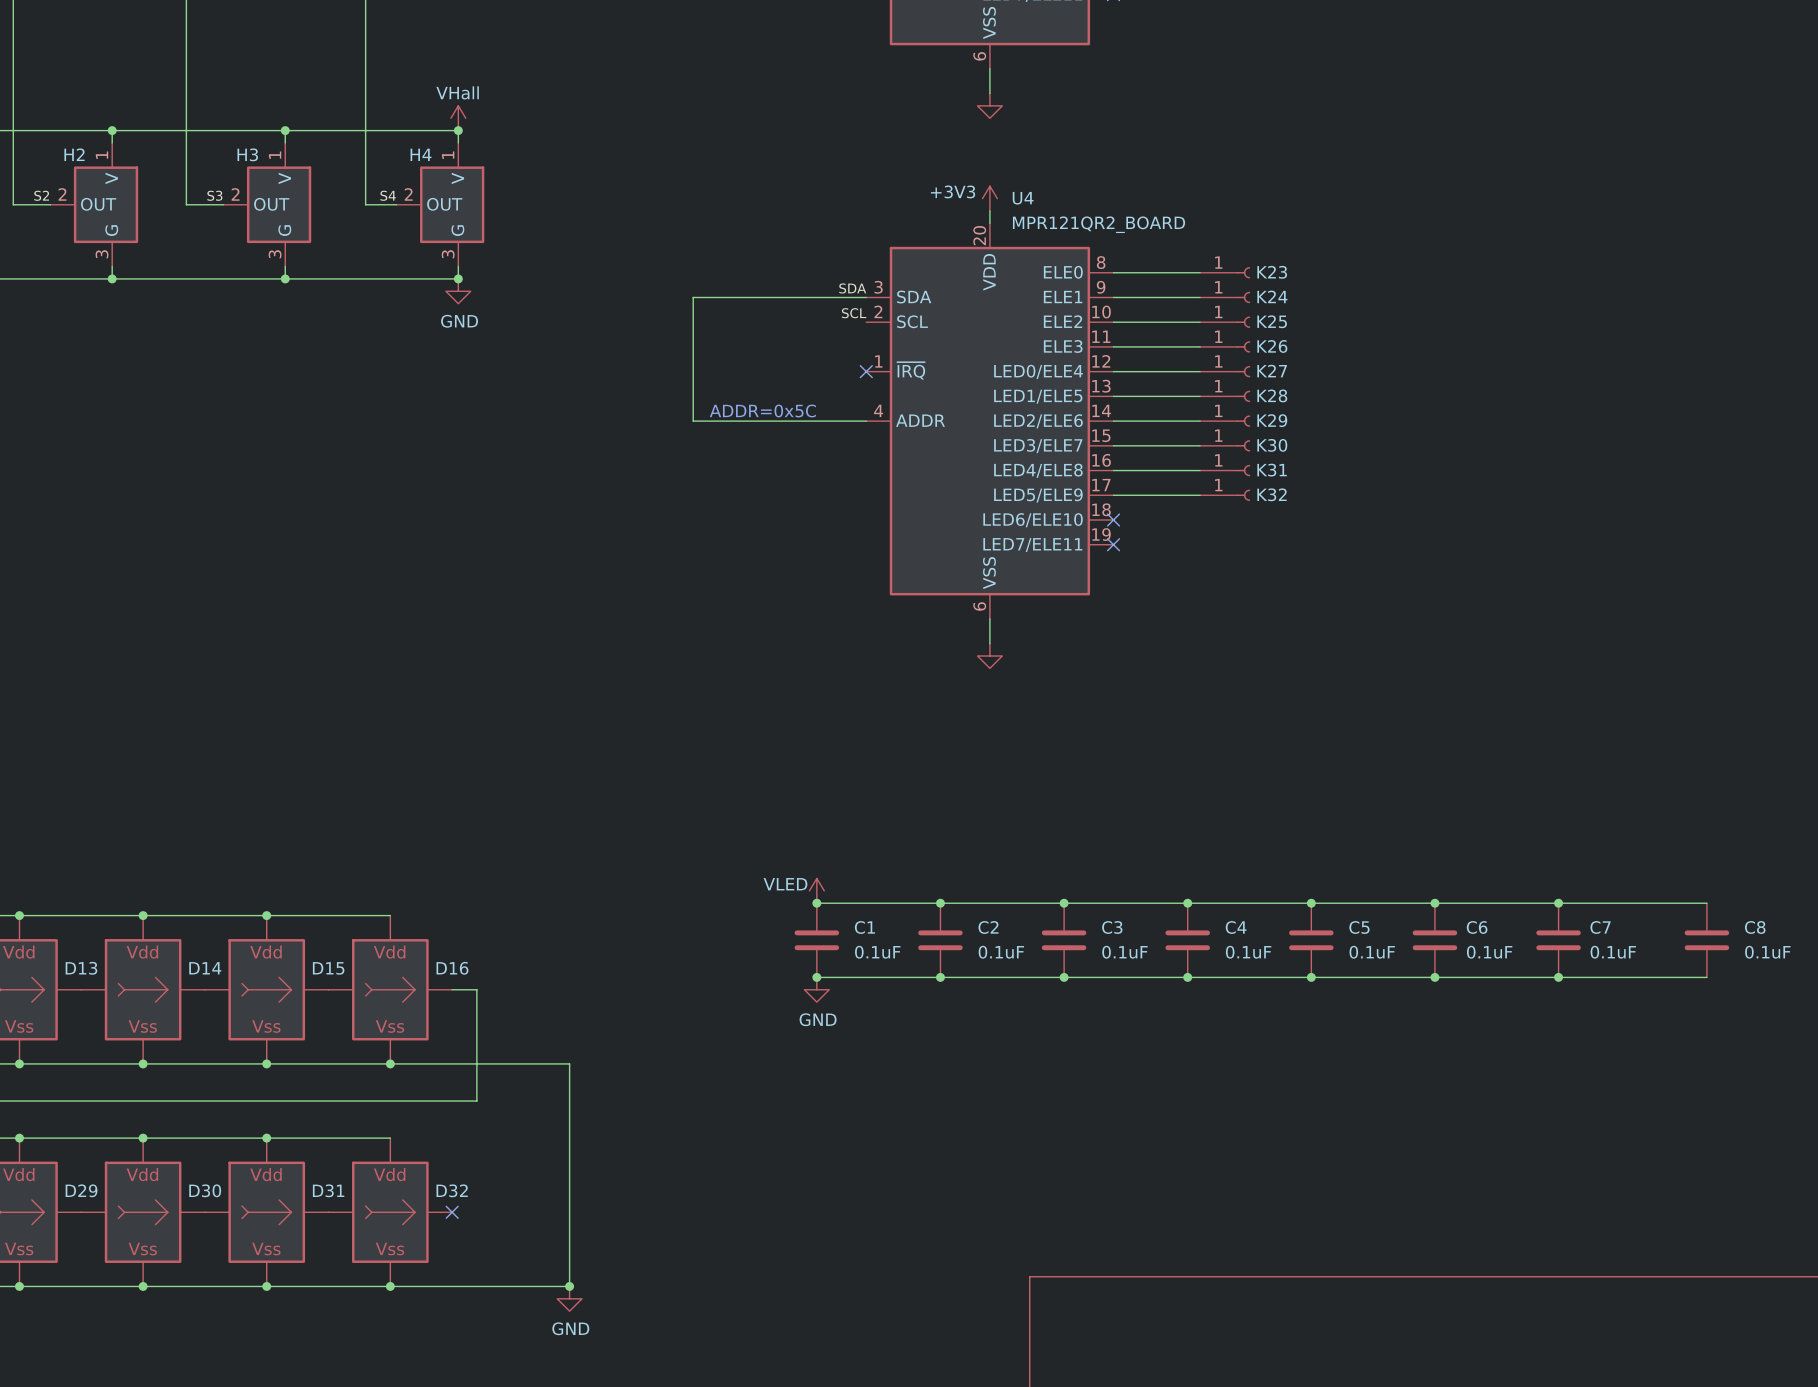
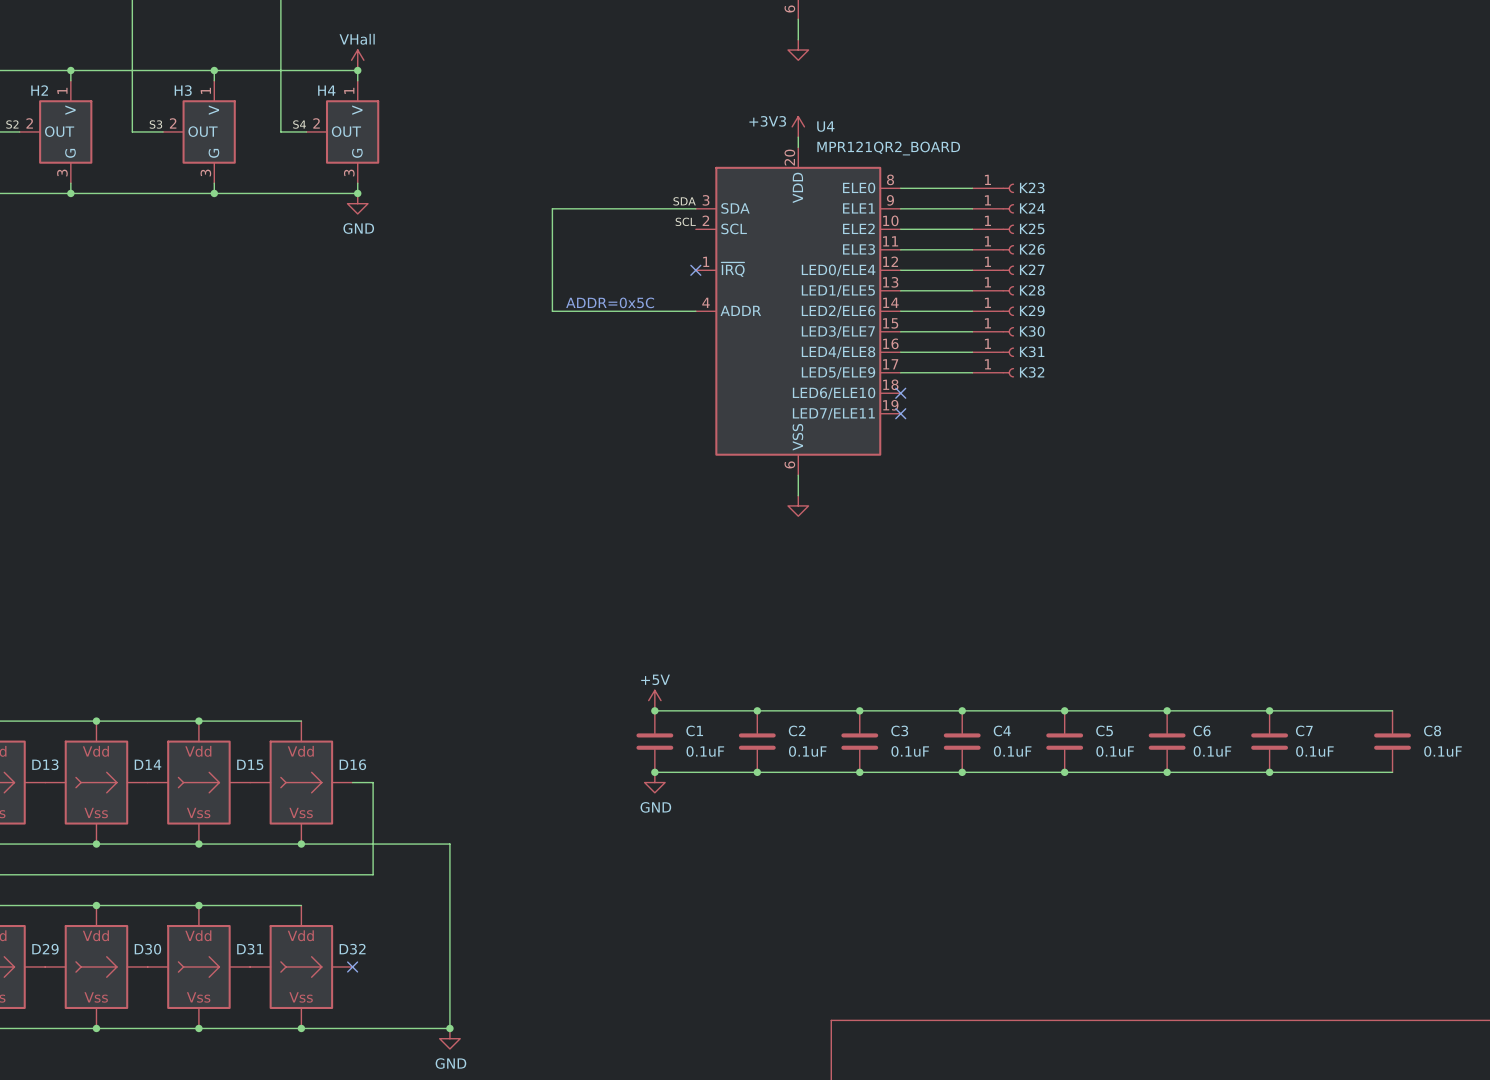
power symbol: VLED (816, 890) -> +5V (654, 700)

